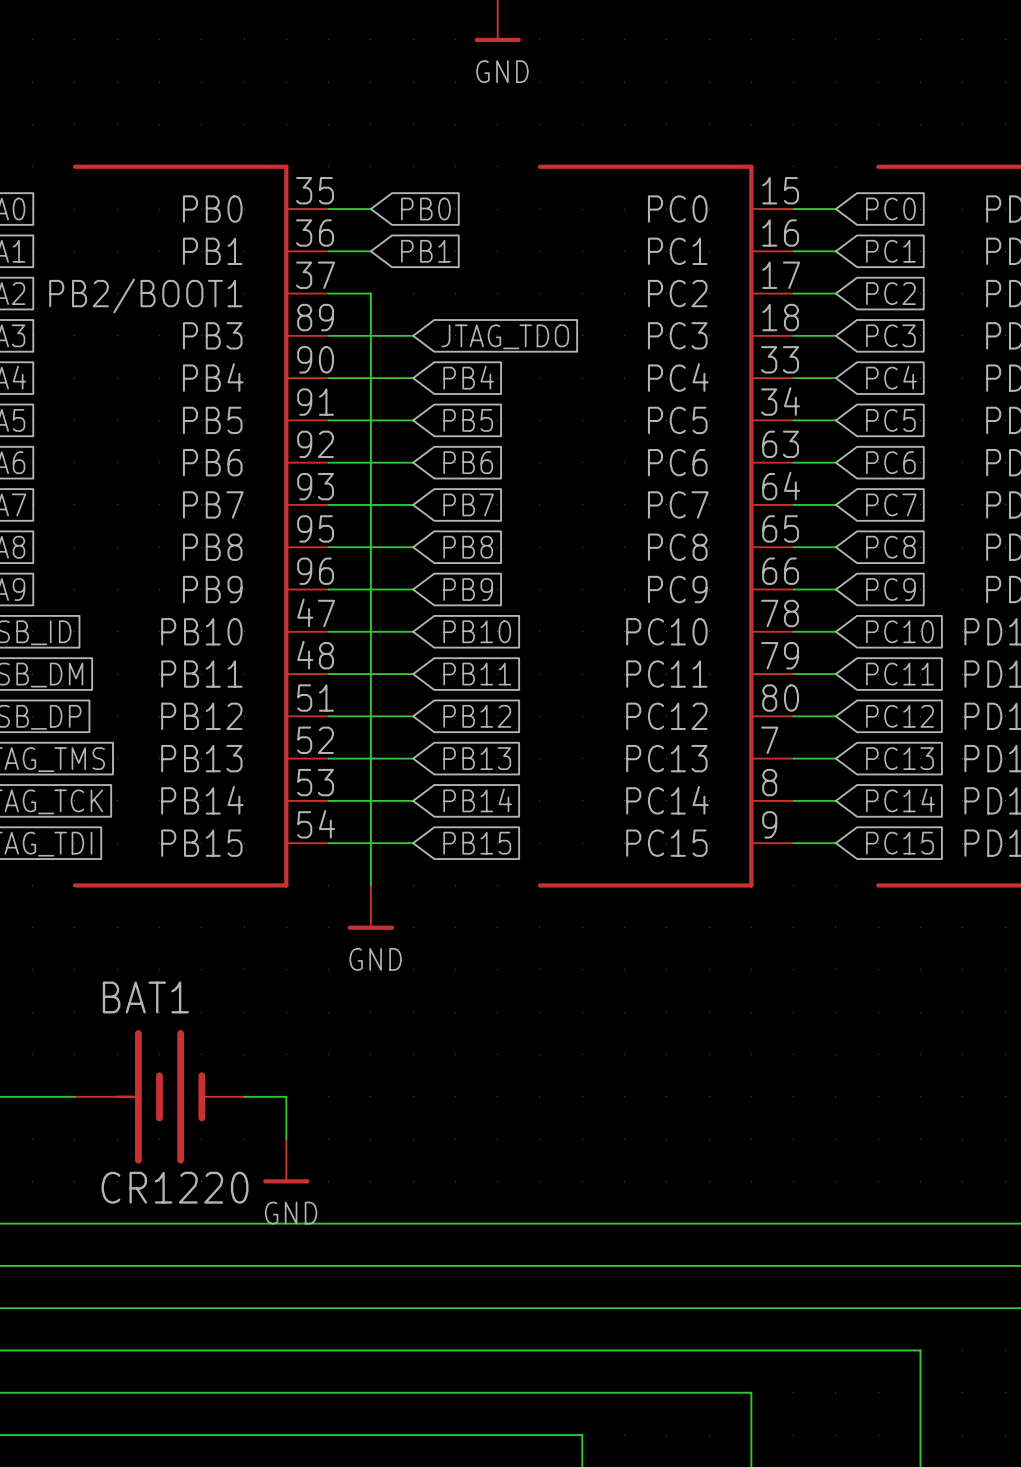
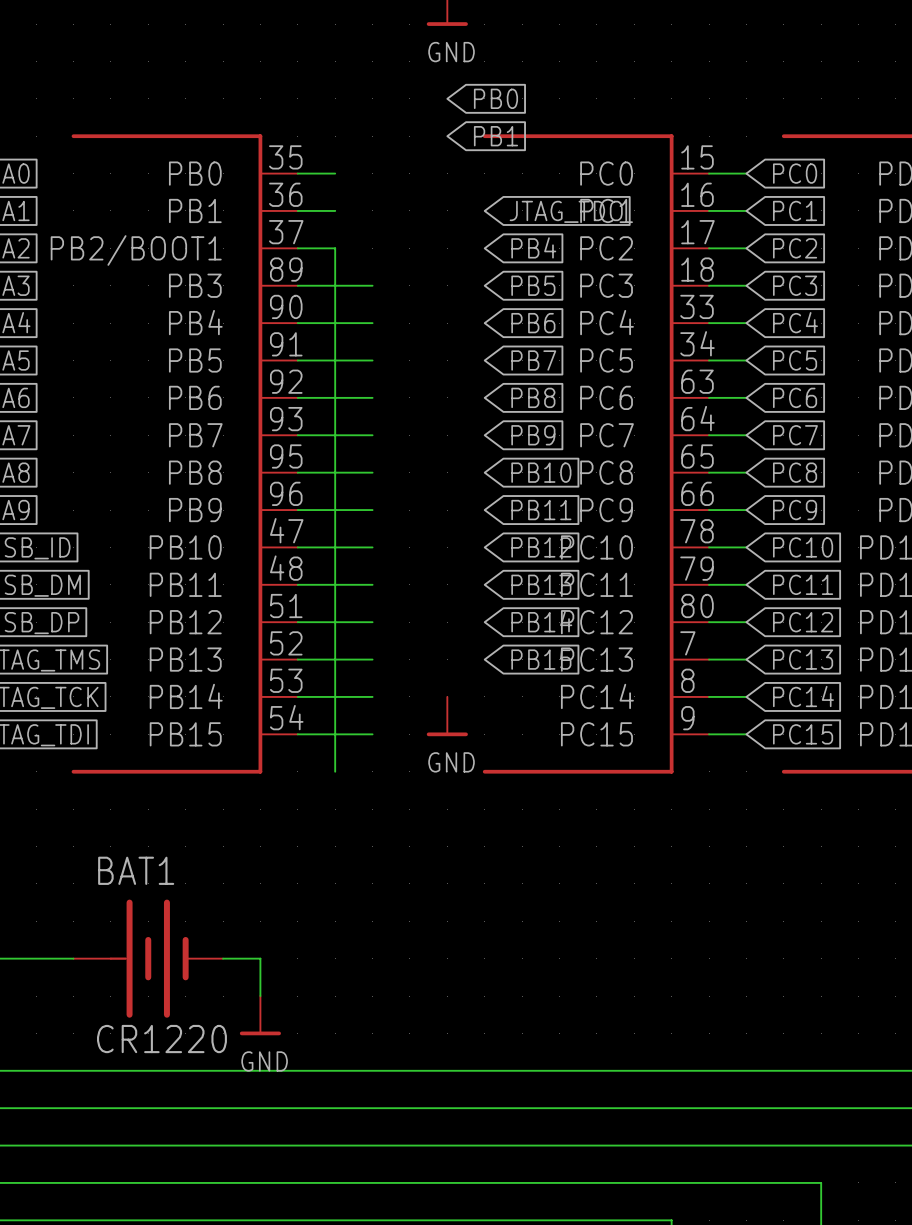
global label position: PB0 (425, 209) -> PB0 (495, 98)
global label position: PB1 (425, 251) -> PB1 (495, 136)
global label position: JTAG_TDO (505, 336) -> JTAG_TDO (566, 211)
global label position: PB4 (468, 377) -> PB4 (533, 247)
global label position: PB5 (468, 420) -> PB5 (533, 285)
global label position: PB6 (468, 462) -> PB6 (533, 323)
global label position: PB7 (468, 504) -> PB7 (533, 360)
global label position: PB8 (468, 547) -> PB8 (533, 397)
global label position: PB9 (468, 589) -> PB9 (533, 435)
global label position: PB10 (477, 631) -> PB10 (541, 472)
global label position: PB11 (477, 674) -> PB11 (541, 510)
global label position: PB12 (477, 716) -> PB12 (541, 547)
global label position: PB13 (477, 758) -> PB13 (541, 584)
global label position: PB14 (477, 800) -> PB14 (541, 621)
global label position: PB15 (477, 843) -> PB15 (541, 659)
power symbol position: GND (370, 907) -> GND (447, 716)

